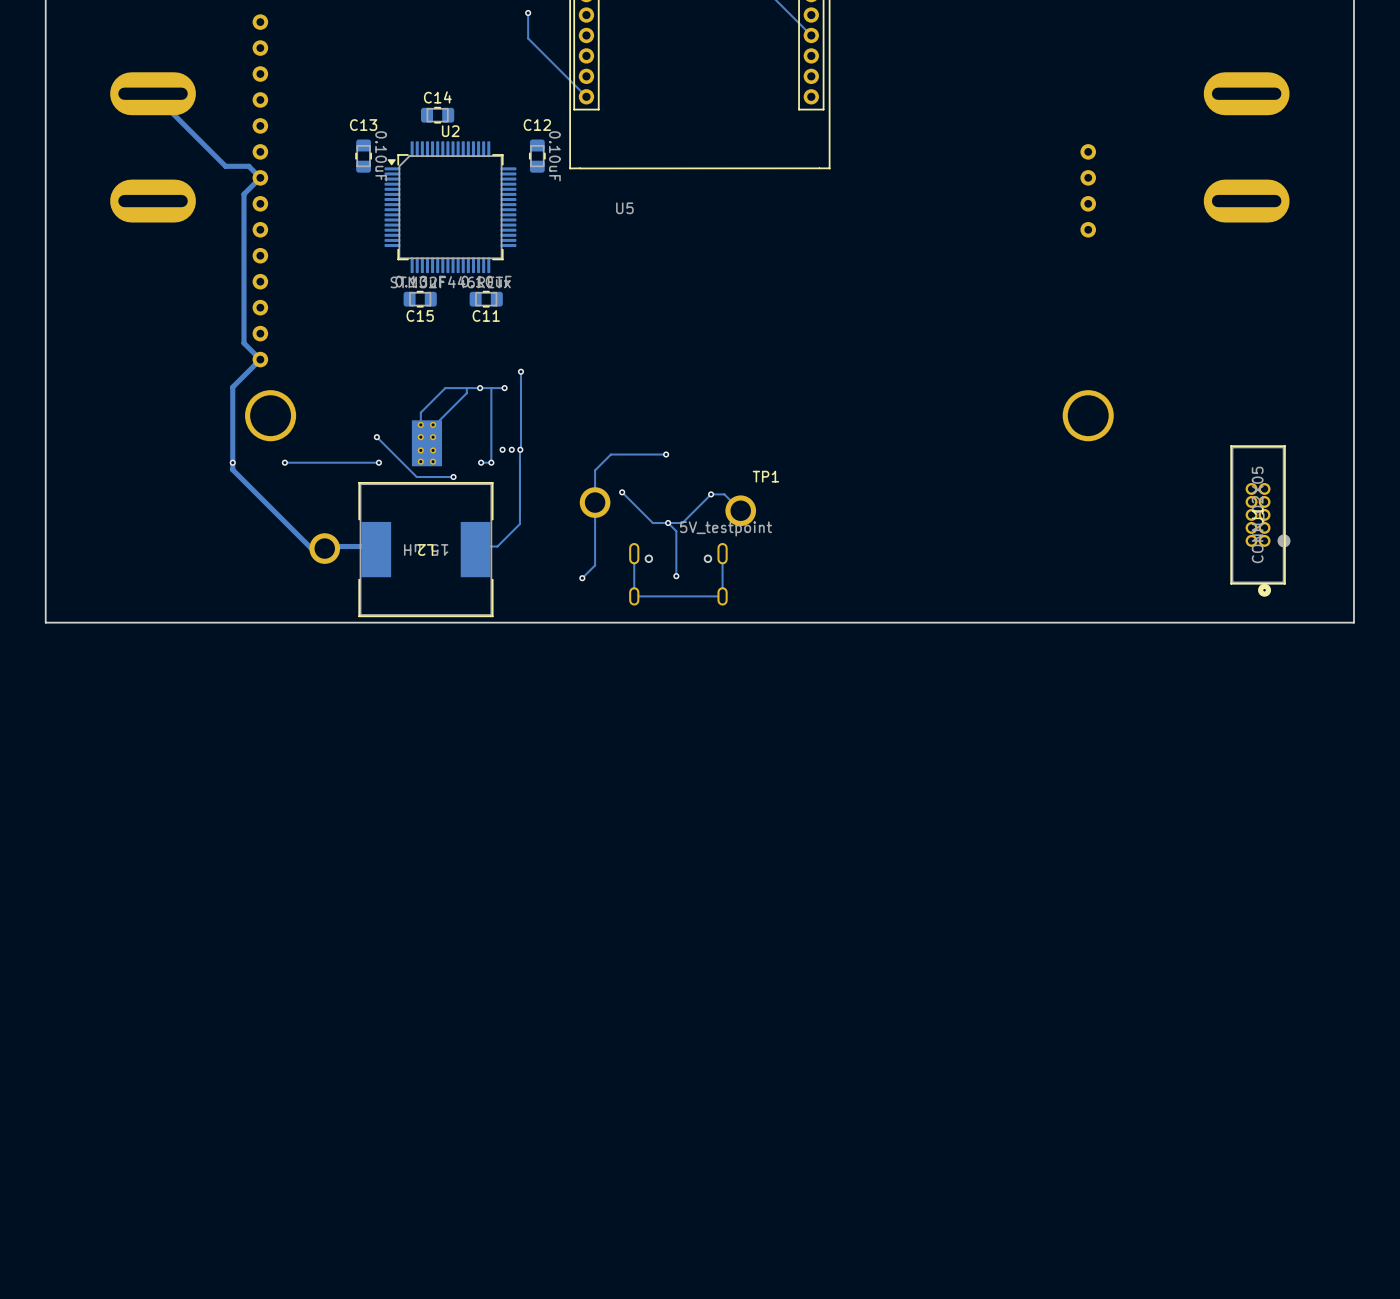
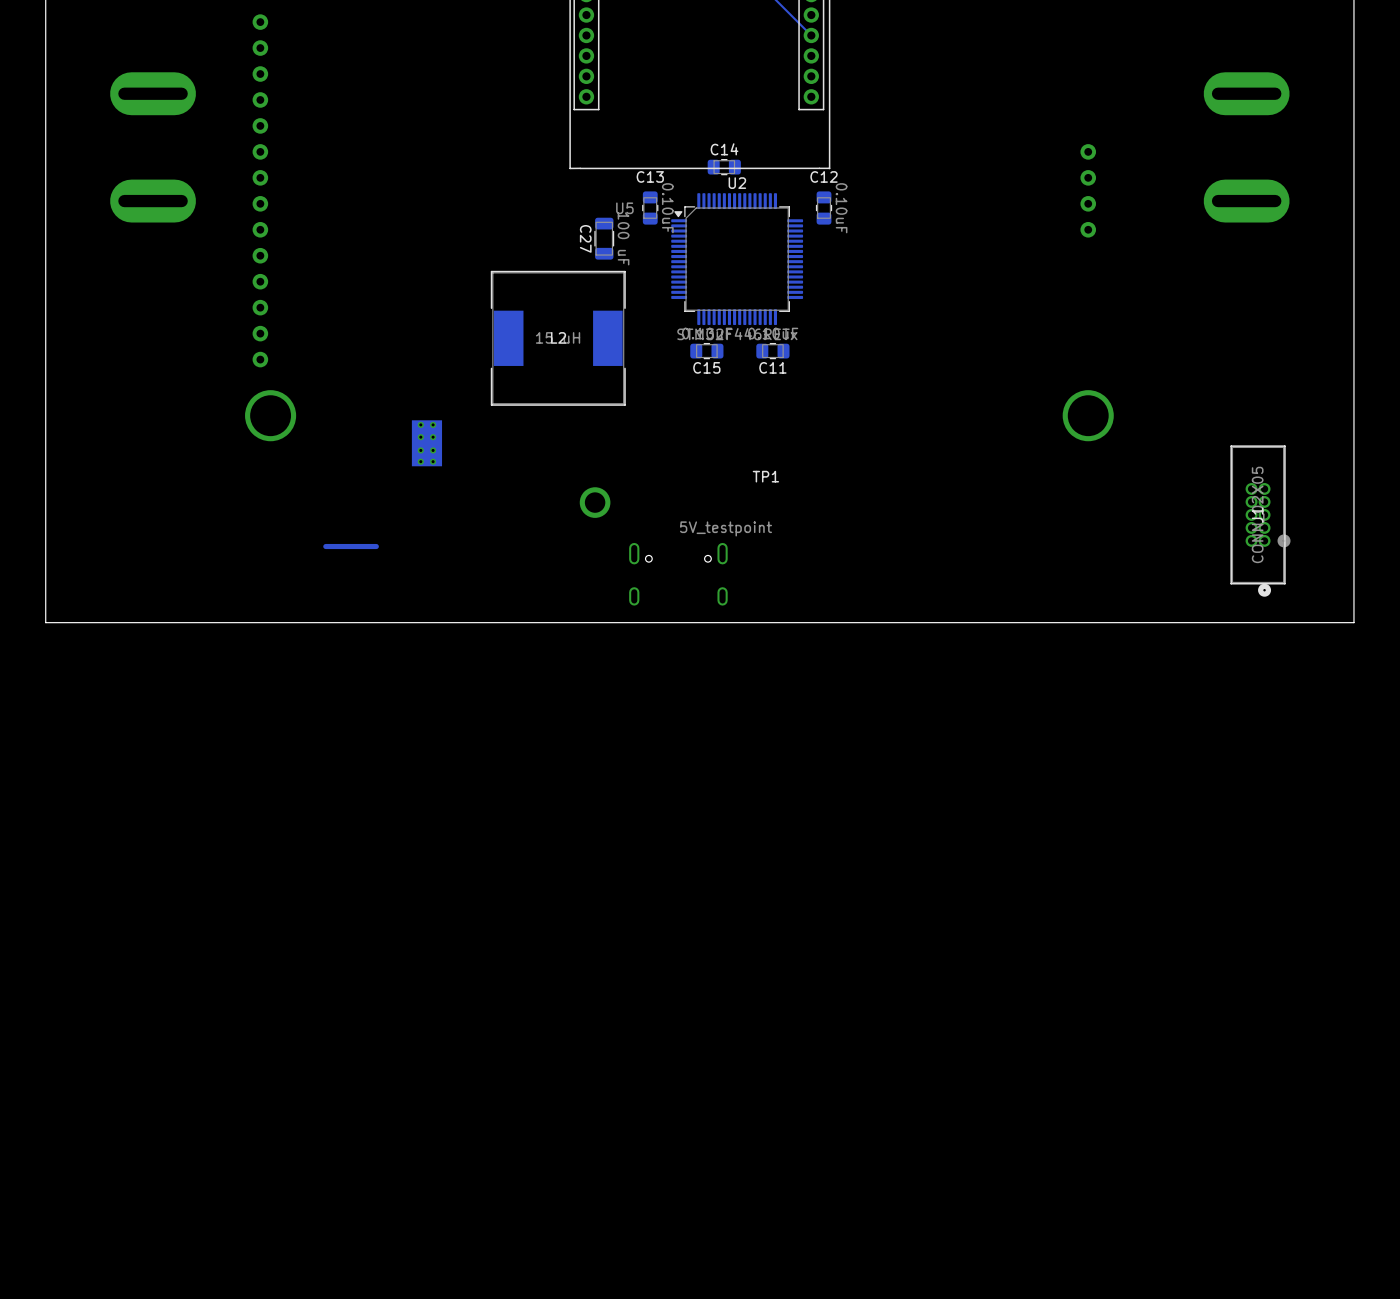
track: (528, 12) (528, 38) (586, 96) -> none
via: (528, 12) -> none
track: (153, 93) (225, 166) (248, 166) (260, 177) (244, 194) (244, 343) (260, 359) (232, 387) (232, 469) (311, 548) (324, 548) -> none
C14 position: (437, 115) -> (724, 167)
C13 position: (363, 156) -> (650, 208)
C12 position: (537, 156) -> (824, 208)
U2 position: (450, 207) -> (737, 259)
C27: none -> 100 uF (604, 238)
C15 position: (420, 299) -> (706, 351)
C11 position: (486, 299) -> (772, 351)
track: (520, 371) (519, 524) (497, 546) (475, 546) (475, 539) -> none
via: (520, 371) -> none
track: (466, 388) (466, 393) (433, 424) -> none
via: (480, 388) -> none
track: (491, 388) (491, 462) (479, 462) -> none
track: (504, 388) (445, 388) (420, 412) (420, 424) -> none
via: (504, 388) -> none
track: (376, 437) (416, 477) (453, 477) -> none
via: (376, 437) -> none
via: (502, 449) -> none
via: (511, 449) -> none
via: (520, 449) -> none
track: (666, 454) (610, 454) (595, 470) (595, 565) (582, 578) -> none
via: (666, 454) -> none
via: (232, 462) -> none
via: (284, 462) -> none
track: (378, 462) (284, 462) -> none
via: (378, 462) -> none
via: (481, 462) -> none
via: (491, 462) -> none
via: (453, 477) -> none
track: (622, 492) (652, 523) (682, 523) (711, 494) (724, 494) (740, 510) -> none
via: (622, 492) -> none
via: (711, 494) -> none
part: (740, 510) -> none
track: (668, 523) (676, 531) (676, 576) -> none
via: (668, 523) -> none
part: (324, 548) -> none
L2 rotation: 0° (425, 549) -> 180° (558, 338)
L2 position: (425, 549) -> (558, 338)
track: (722, 553) (722, 596) (634, 596) (634, 553) -> none
via: (676, 576) -> none
via: (582, 578) -> none

